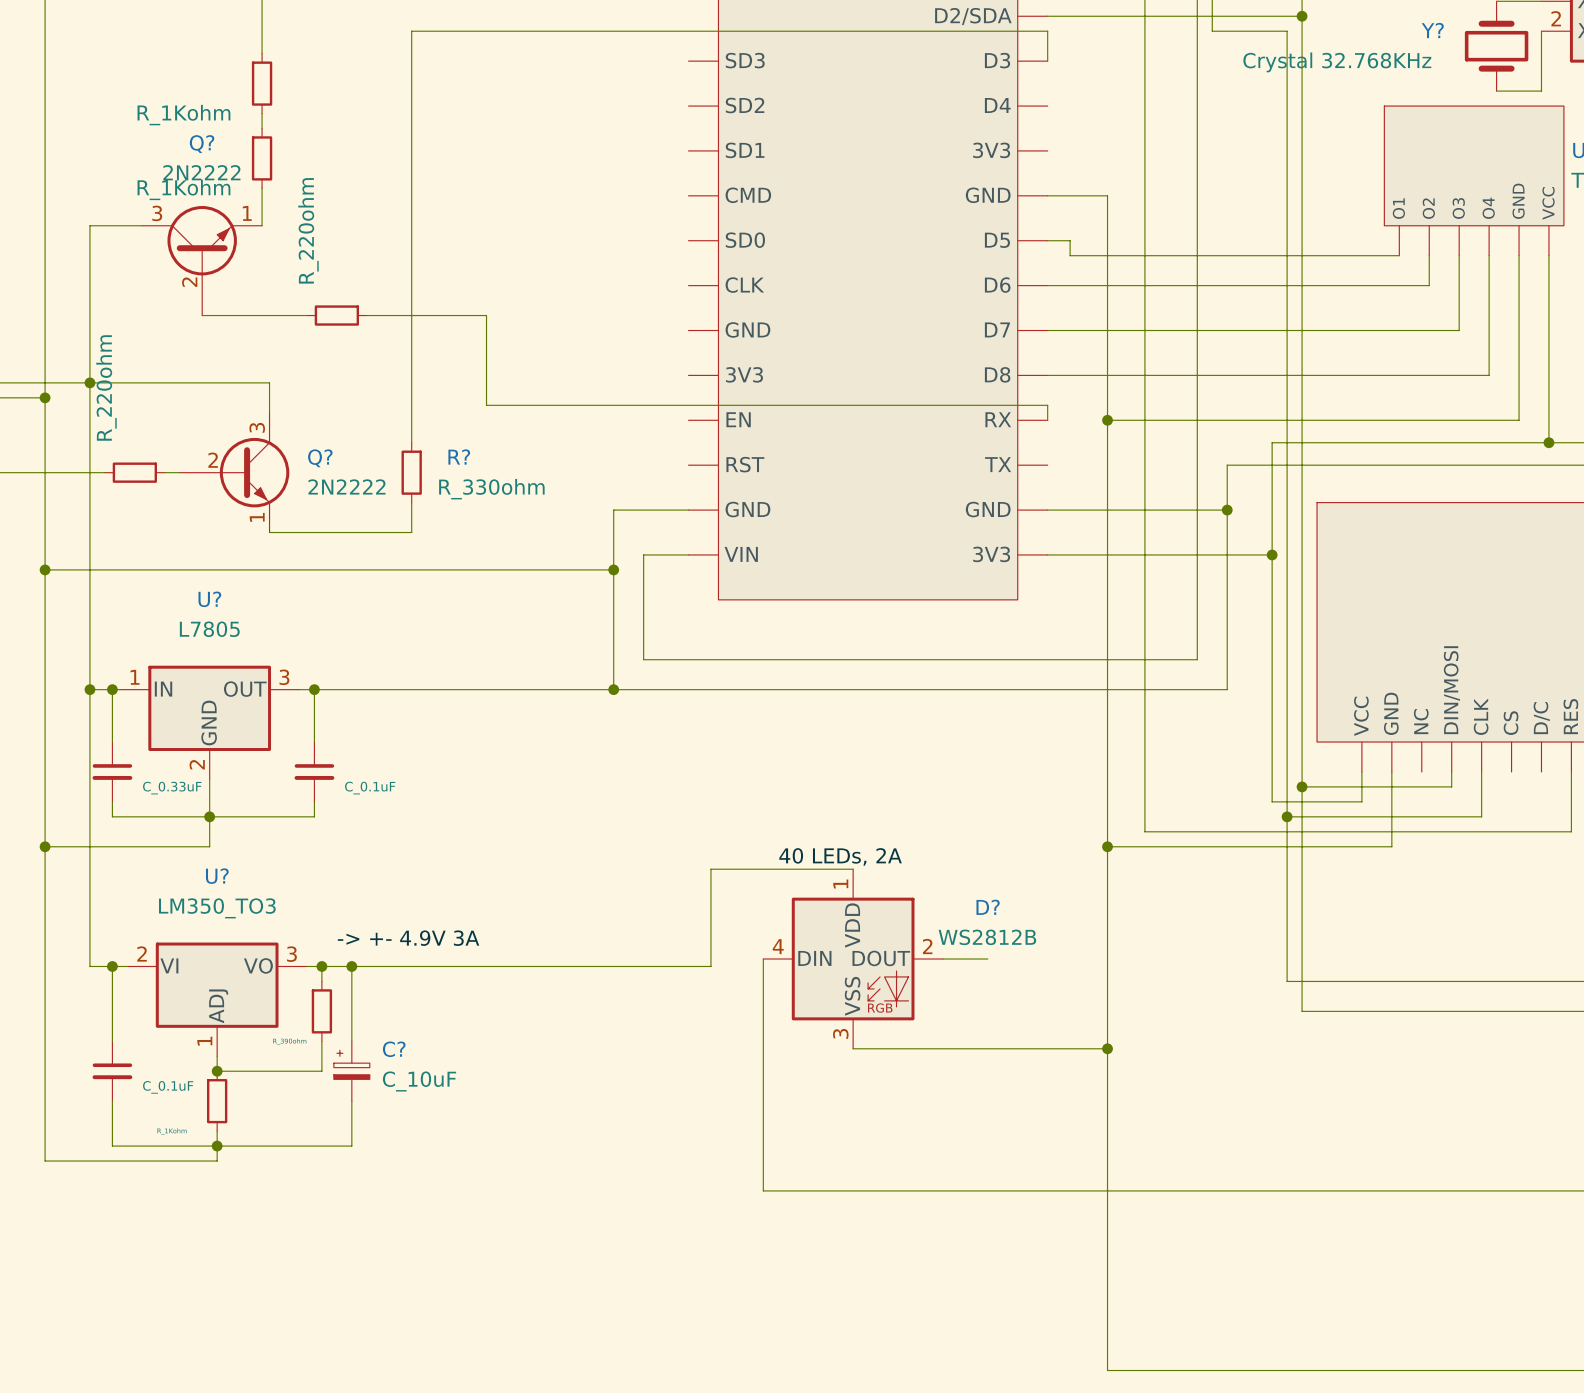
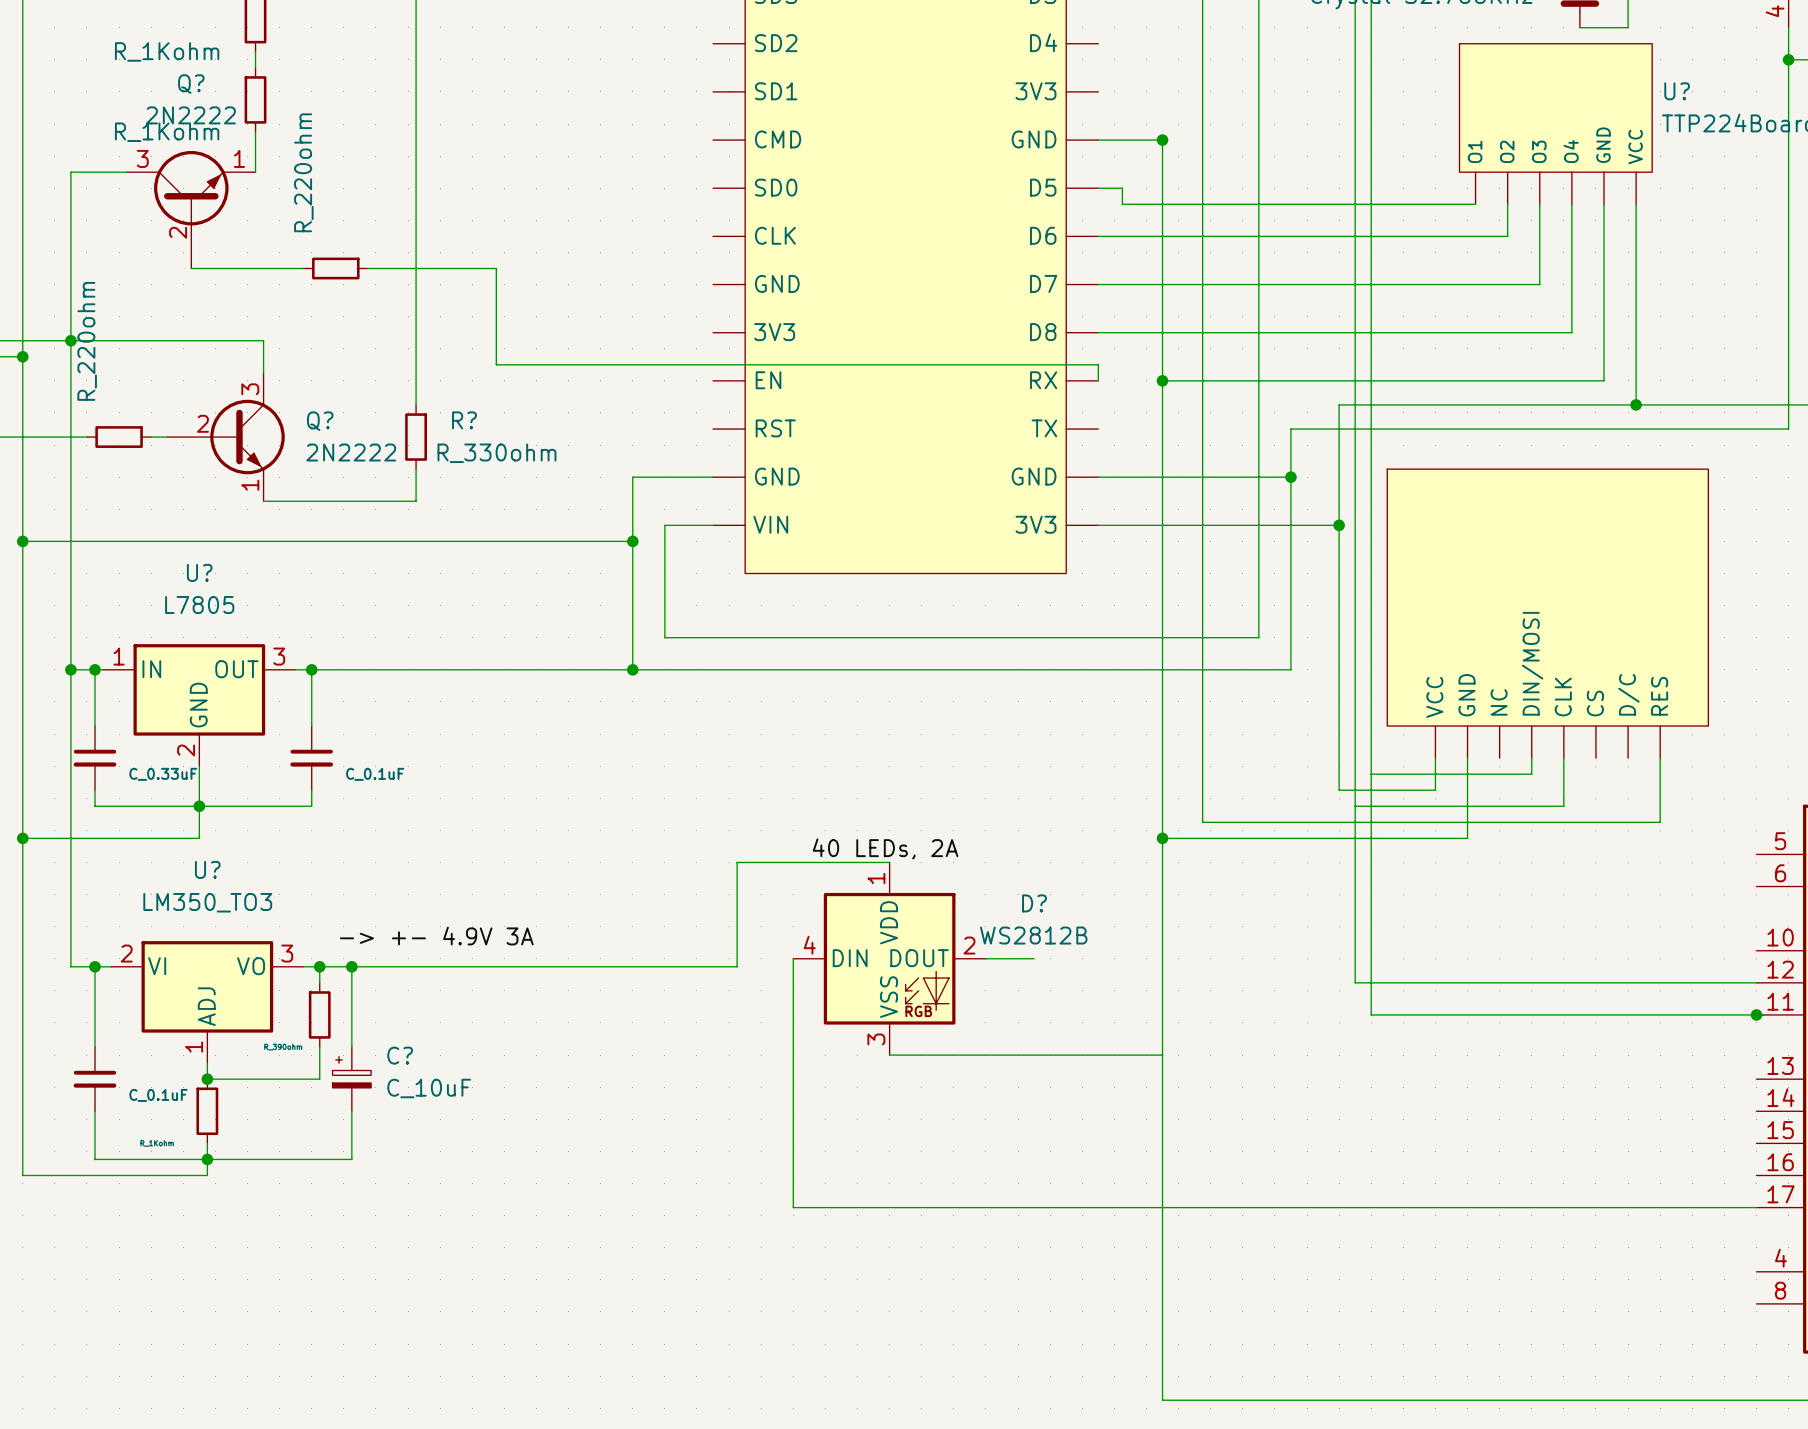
junction: none -> (1162, 140)
junction: (1302, 786) -> none
junction: (1287, 816) -> none
junction: (1107, 1048) -> none

